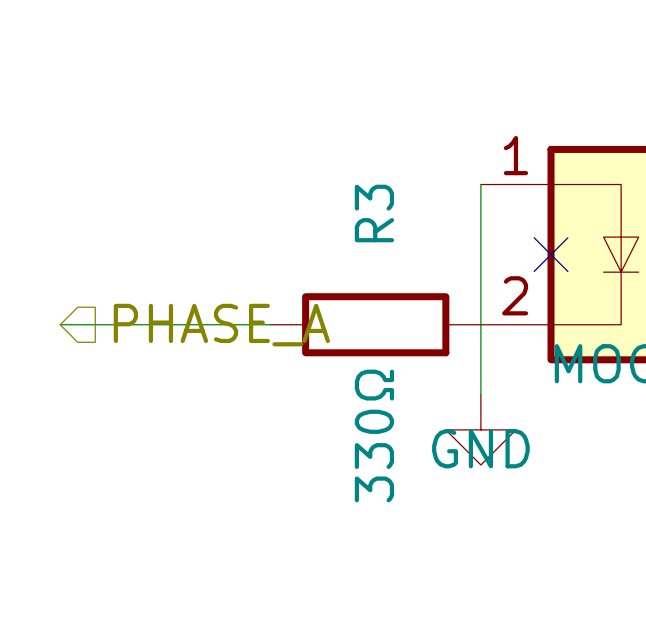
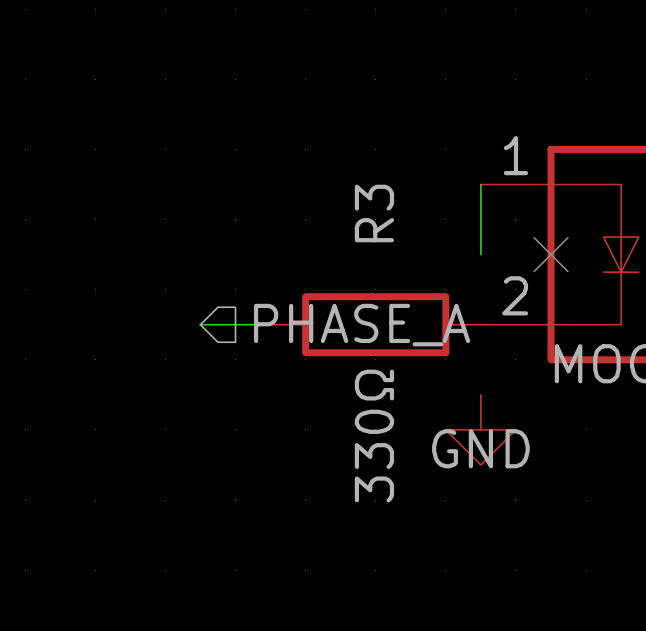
wire: (480, 254) (480, 394) -> none
wire: (60, 324) (200, 324) -> none
hierarchical label position: PHASE_A (221, 325) -> PHASE_A (362, 325)

